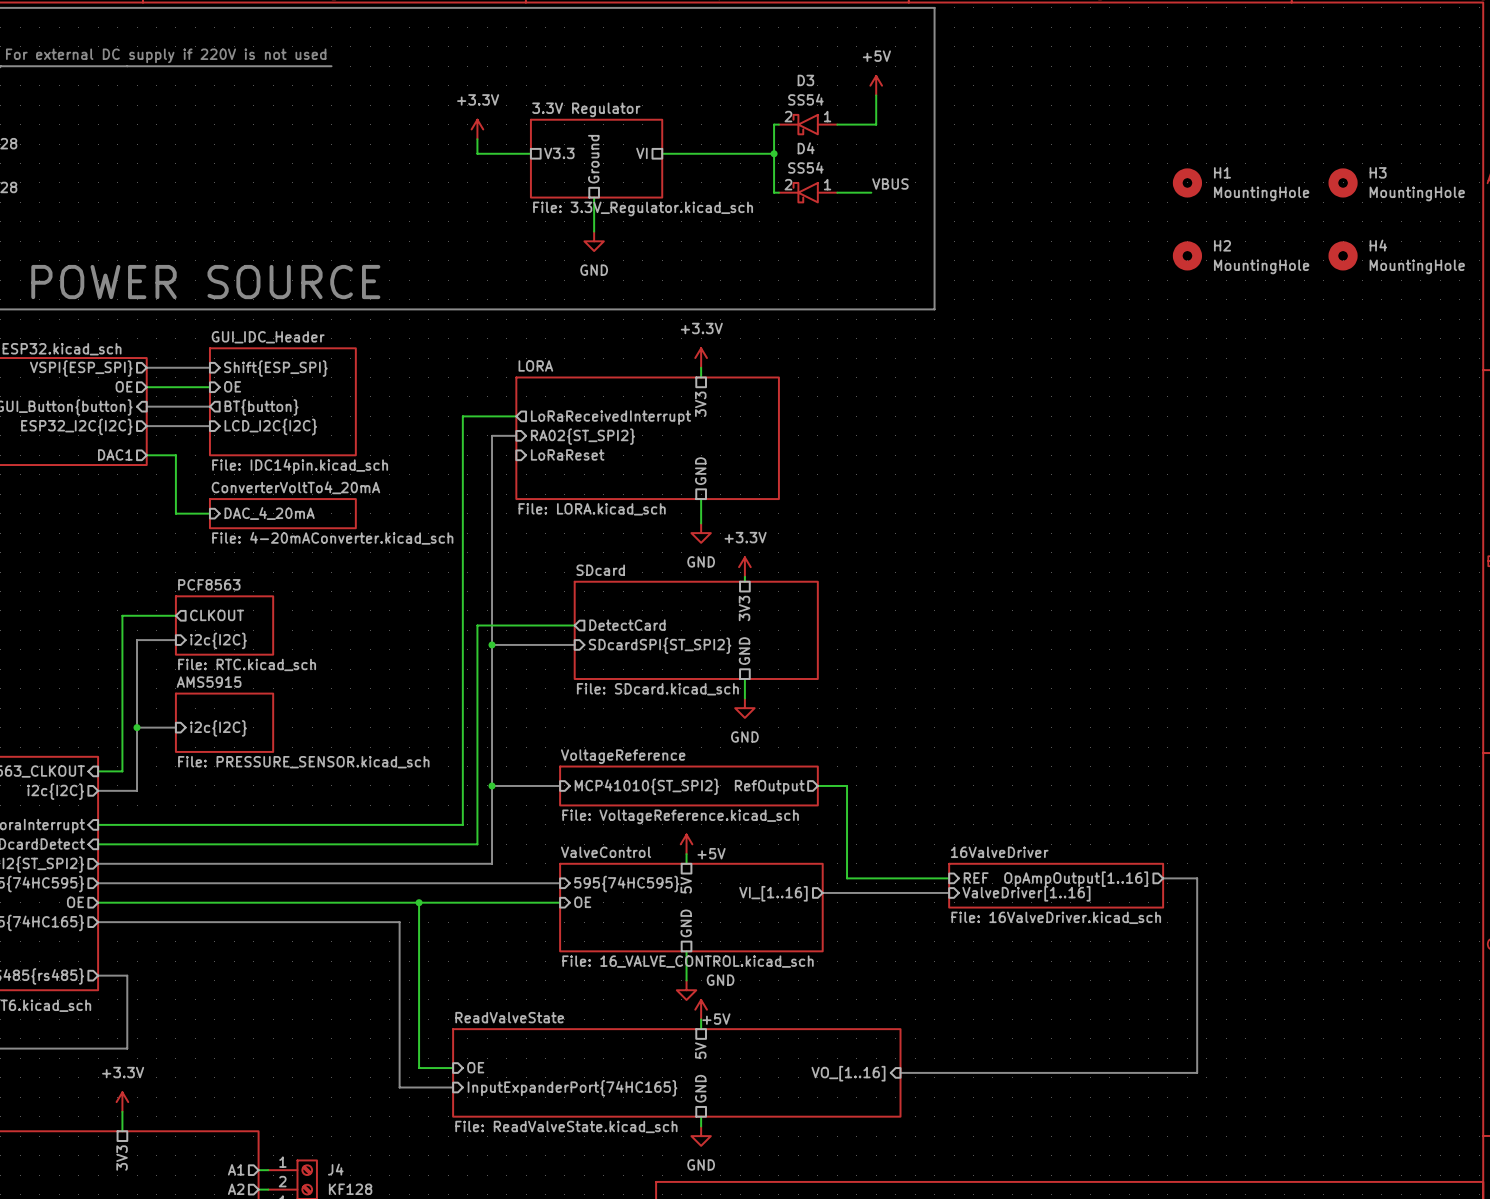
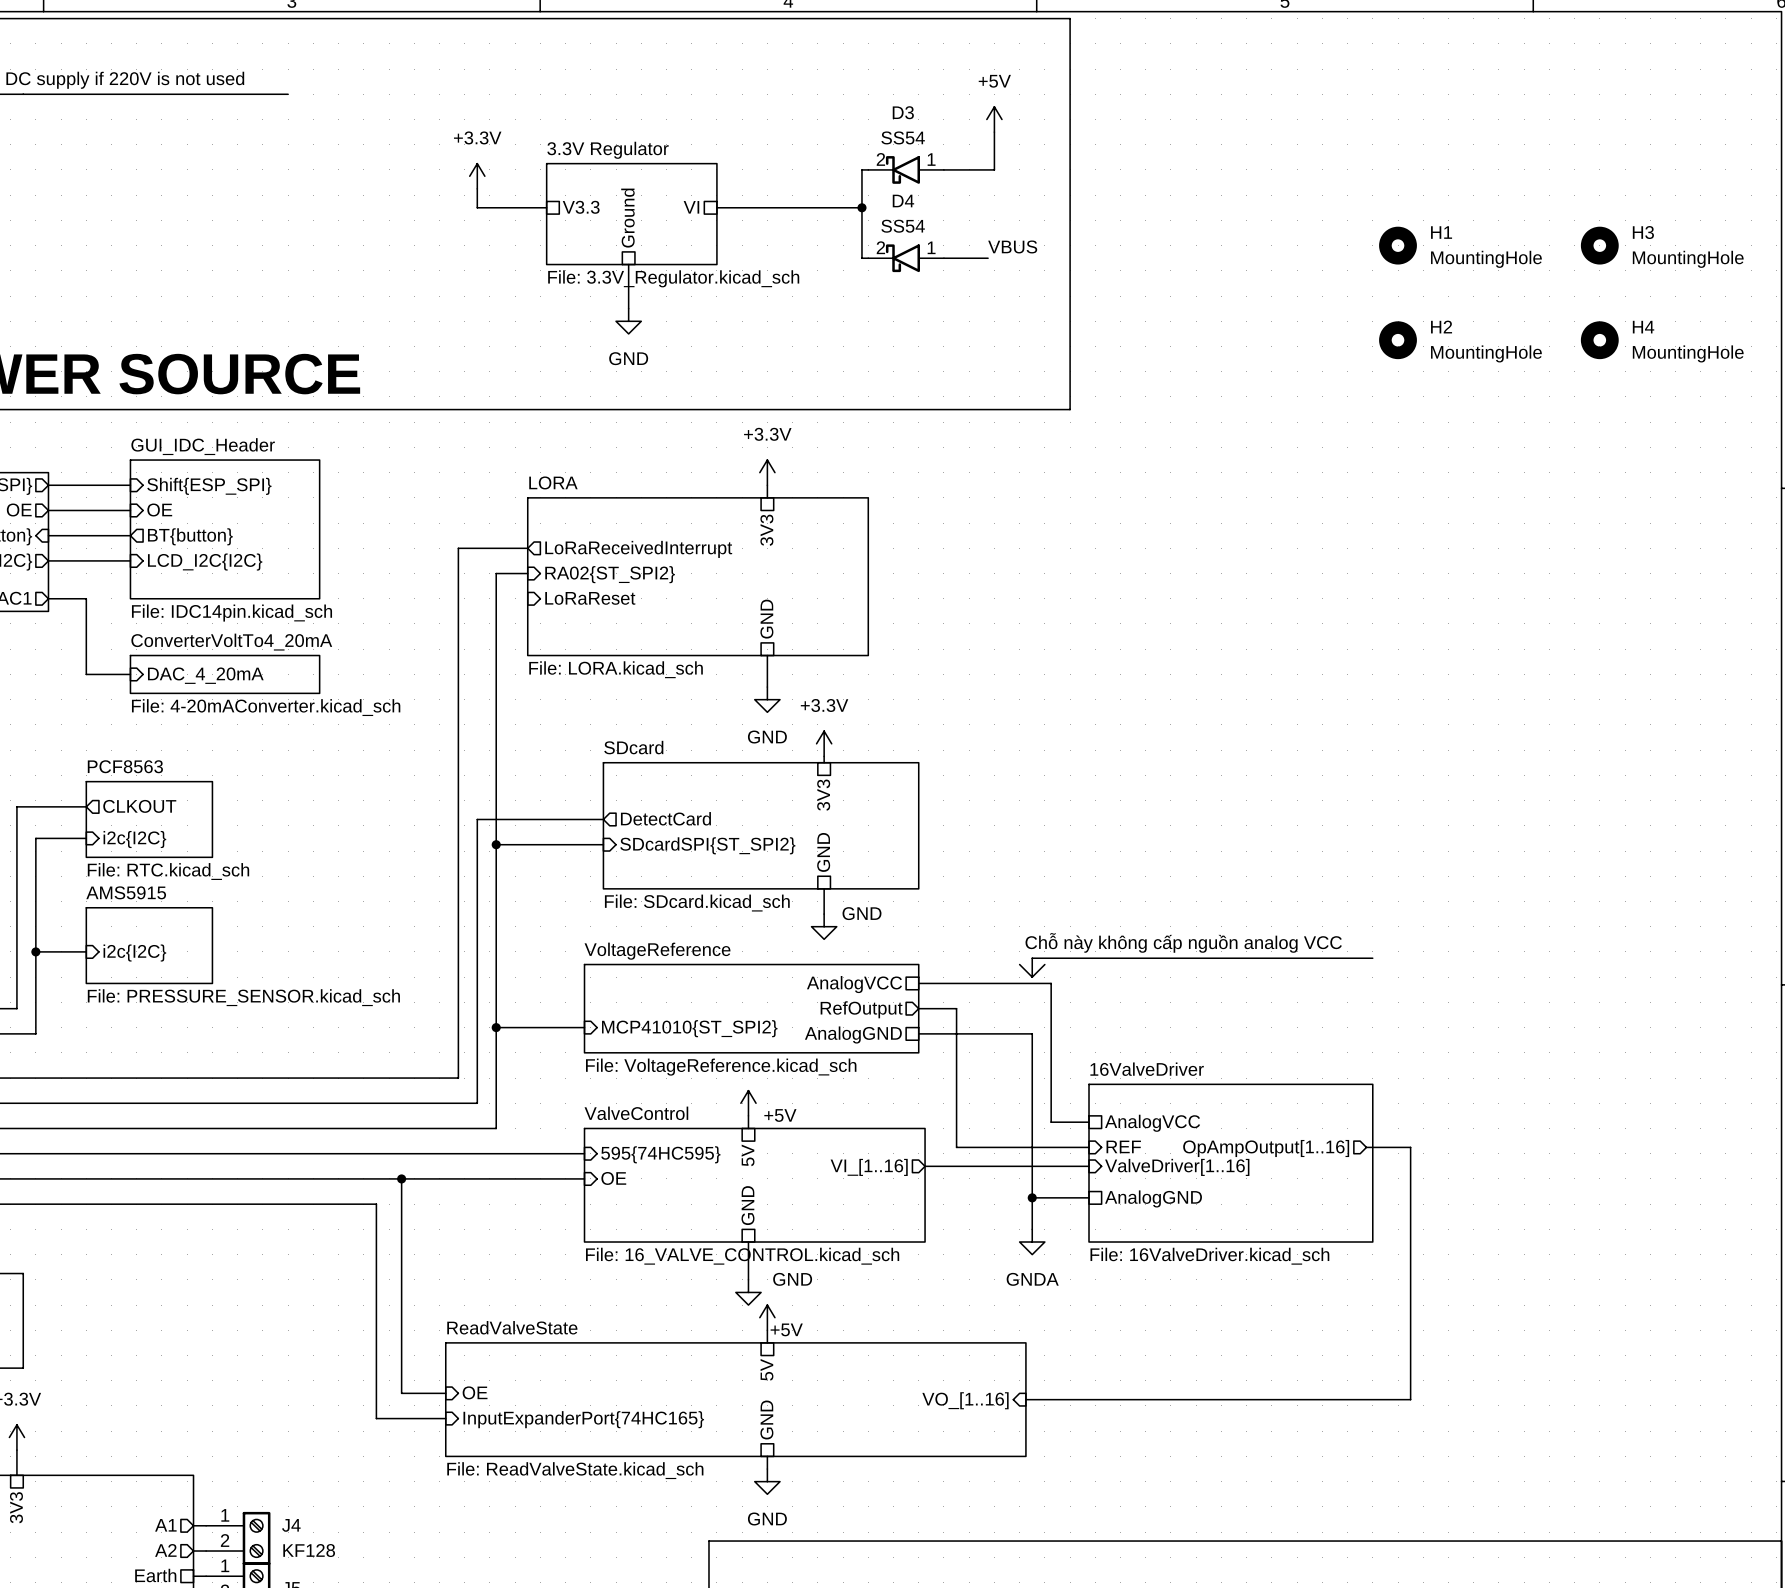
text: none -> Chỗ này không cấp nguồn analog VCC (1183, 942)
line: none -> (1372, 958) (1032, 958) (1032, 977)
power symbol text position: GND (744, 736) -> GND (862, 913)
line: none -> (1019, 964) (1032, 977)
line: none -> (1044, 964) (1032, 977)
wire: none -> (918, 983) (1051, 983) (1051, 1122) (1089, 1122)
sheet pin: none -> AnalogVCC (854, 984)
sheet VoltageReference: none -> File: VoltageReference.kicad_sch (751, 1008)
sheet VoltageReference: File: VoltageReference.kicad_sch (688, 785) -> none
wire: (817, 785) (847, 785) -> (918, 1008) (956, 1008) (956, 1027)
sheet pin position: RefOutput (769, 787) -> RefOutput (861, 1009)
wire: none -> (918, 1033) (1032, 1033) (1032, 1229)
sheet pin: none -> AnalogGND (853, 1034)
sheet 16ValveDriver name position: 16ValveDriver (999, 852) -> 16ValveDriver (1147, 1069)
sheet pin: none -> AnalogVCC (1152, 1123)
sheet 16ValveDriver shape: [948, 863, 1164, 909] -> [1088, 1083, 1374, 1243]
wire: none -> (1032, 1197) (1089, 1197)
junction: none -> (1032, 1197)
sheet 16ValveDriver value position: File: 16ValveDriver.kicad_sch (1056, 917) -> File: 16ValveDriver.kicad_sch (1209, 1256)
sheet pin: none -> AnalogGND (1153, 1198)
power symbol: none -> GNDA (1032, 1242)

